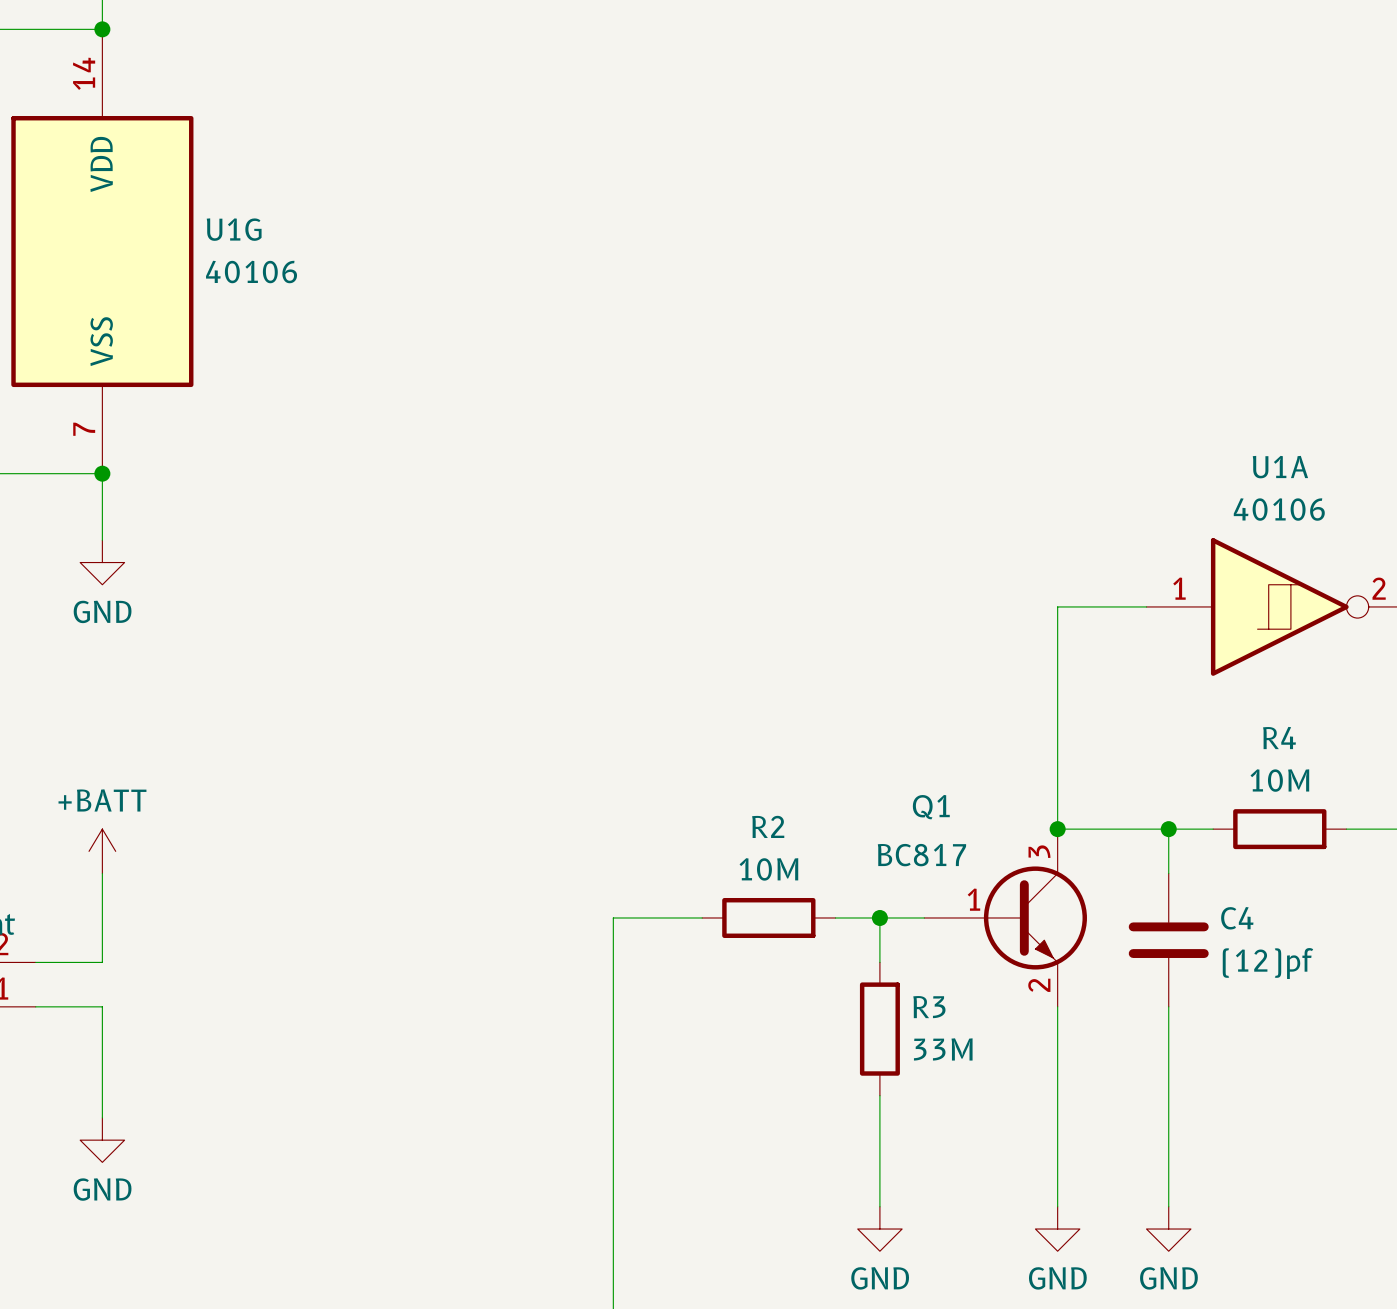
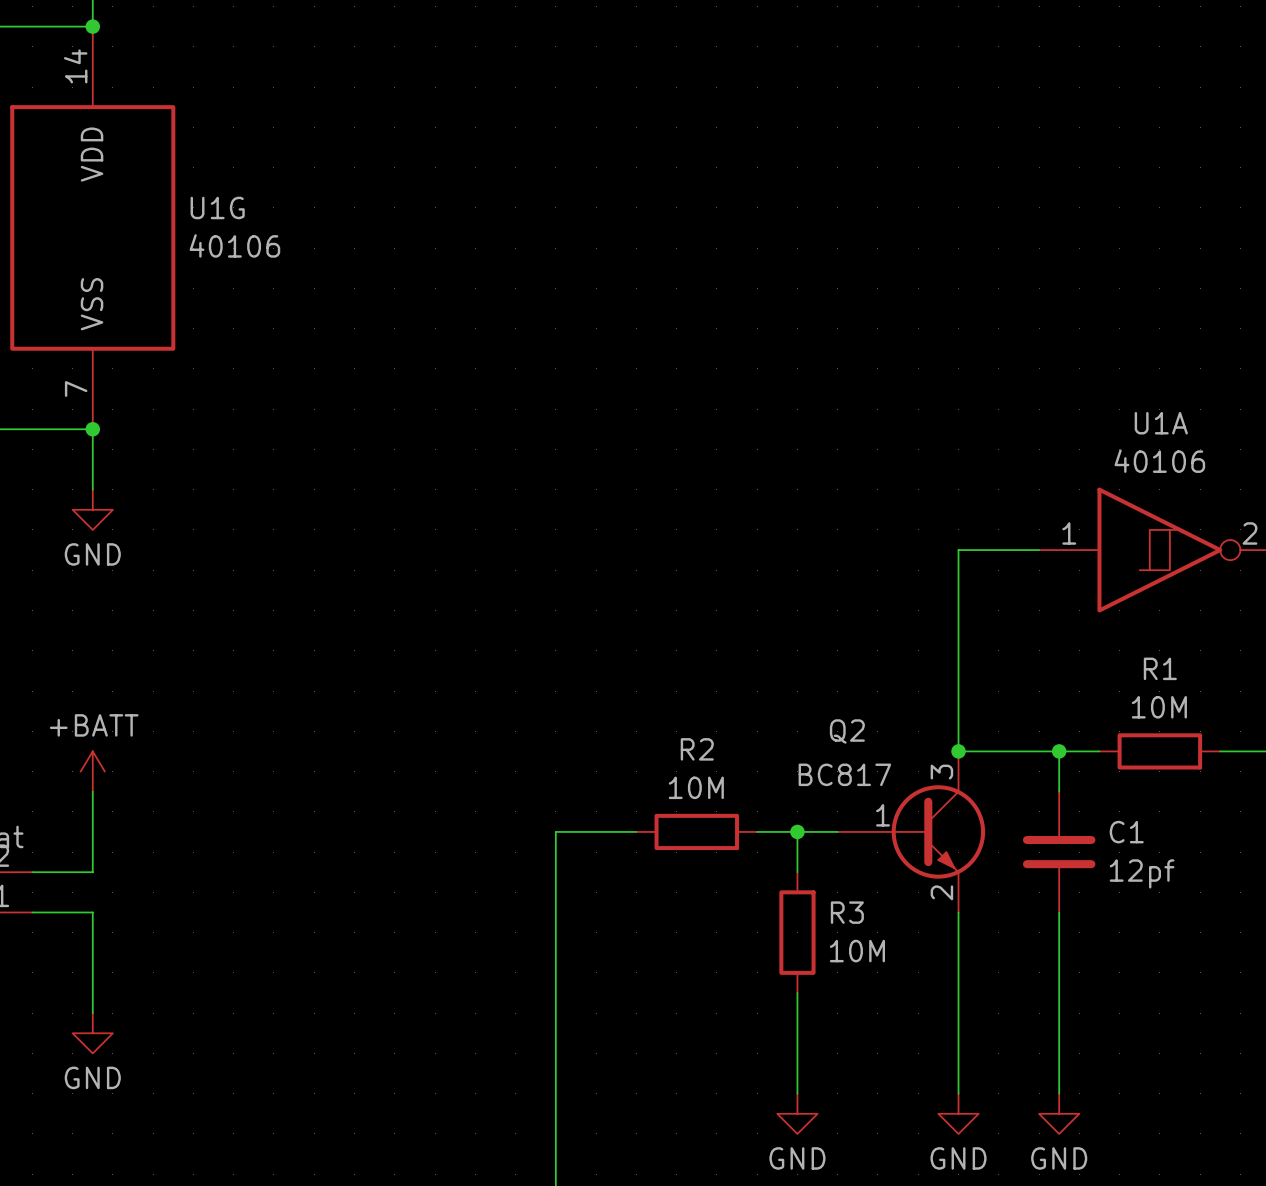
R4 name: R4 (1279, 738) -> R1 (1160, 668)
Q1 name: Q1 (931, 807) -> Q2 (847, 731)
C4 name: C4 (1237, 918) -> C1 (1126, 832)
C4 value: (12)pf (1267, 963) -> 12pf (1142, 873)
R3 value: 33M (943, 1049) -> 10M (857, 951)

